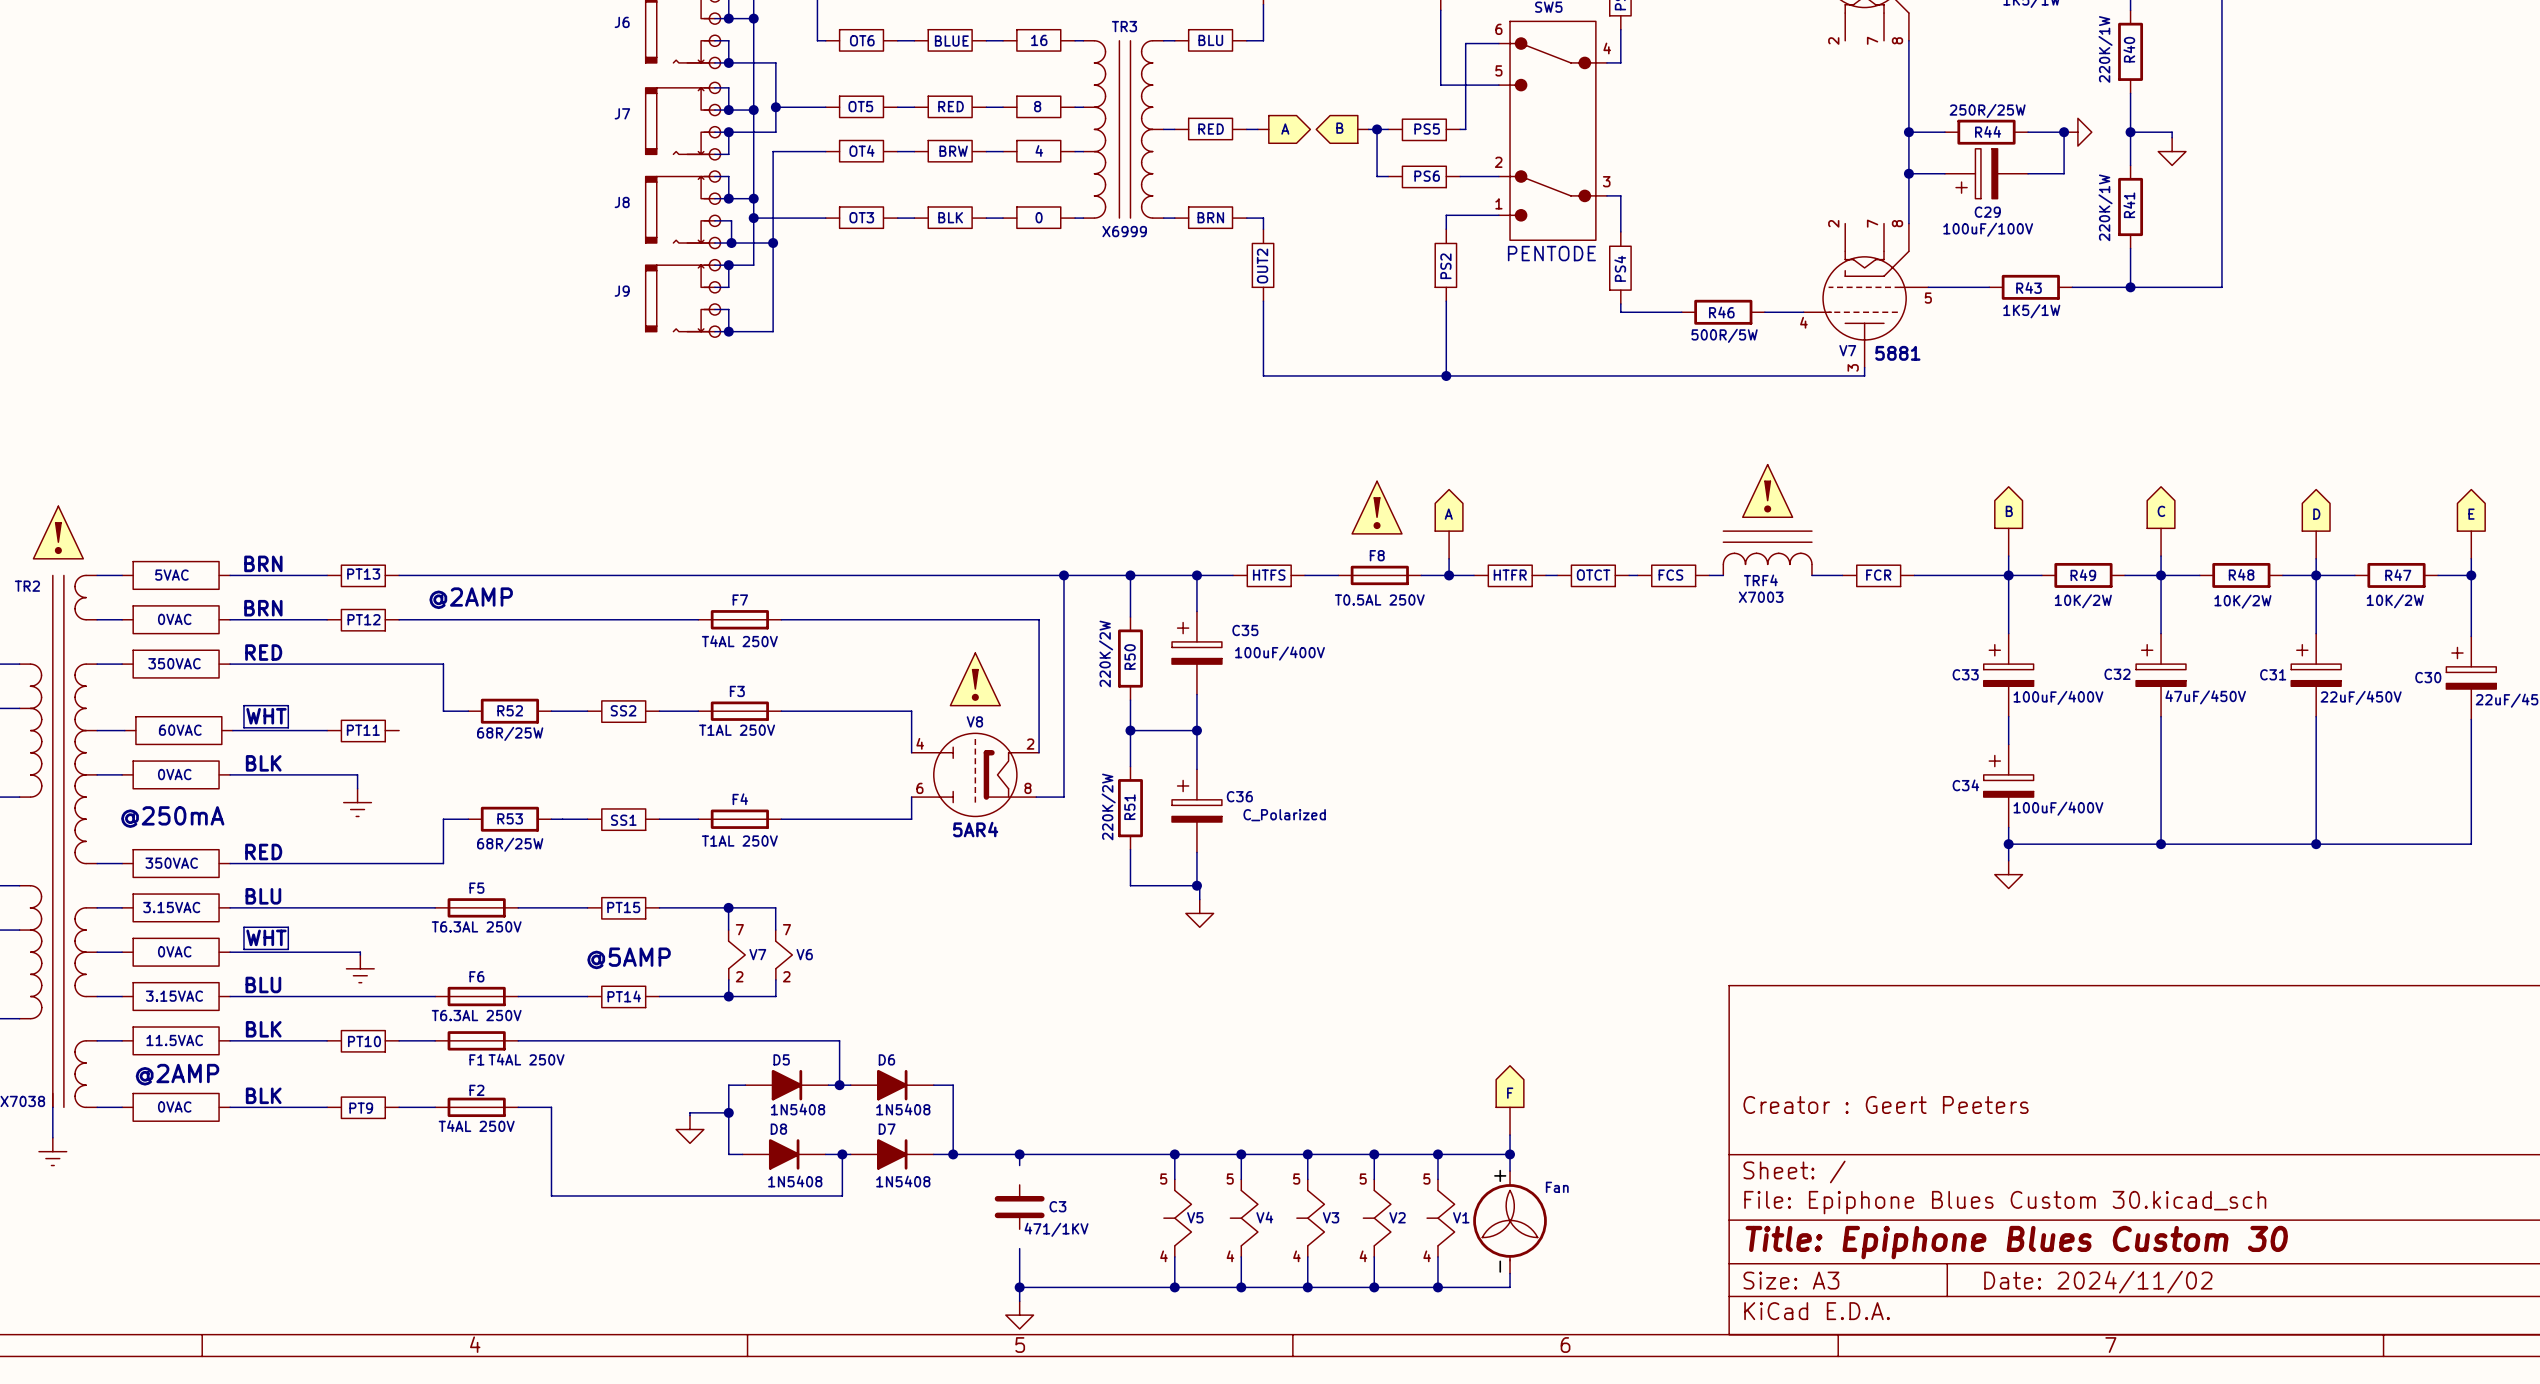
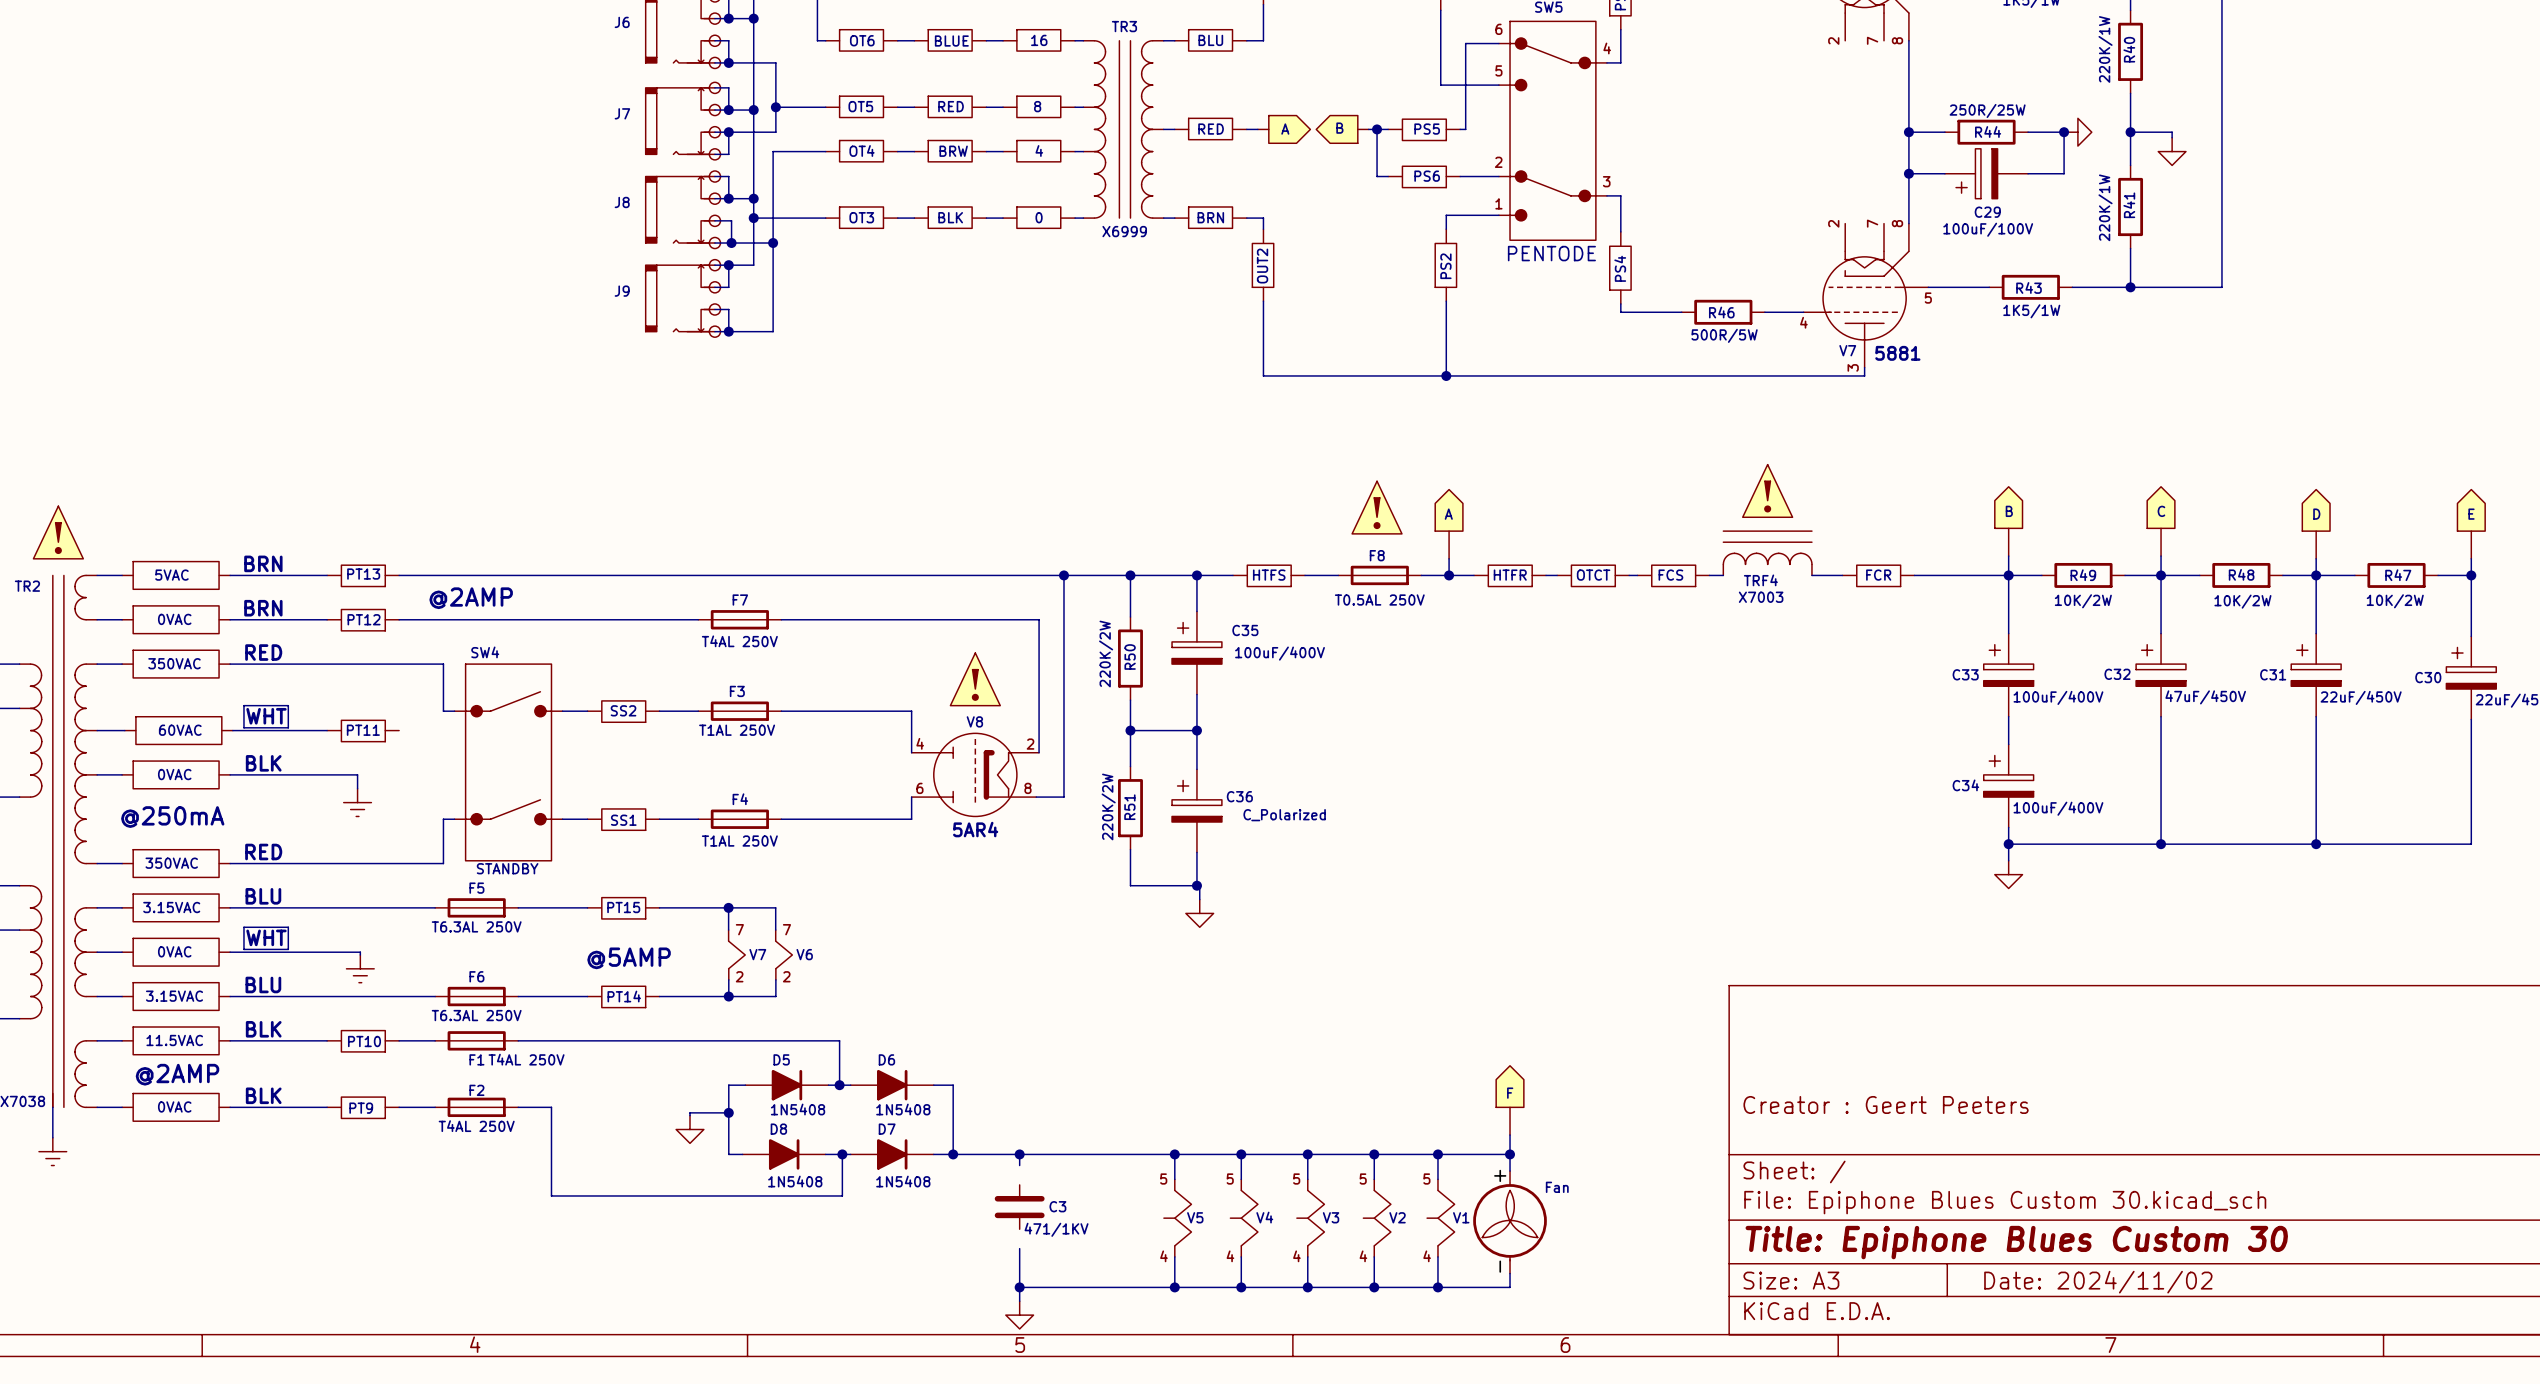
R52: 68R/25W (509, 711) -> none
SW4: none -> STANDBY (508, 762)
R53: 68R/25W (509, 819) -> none

